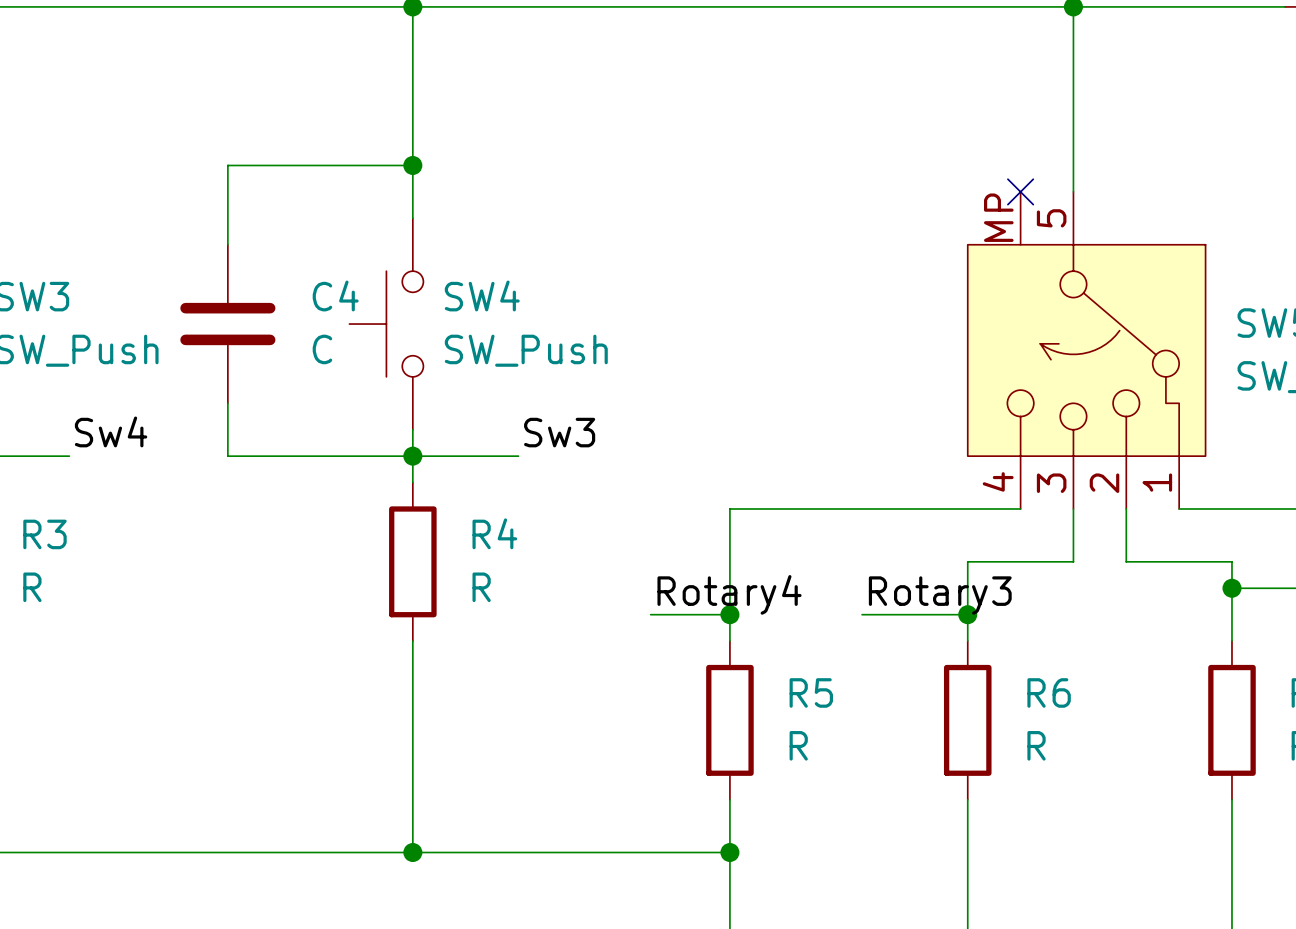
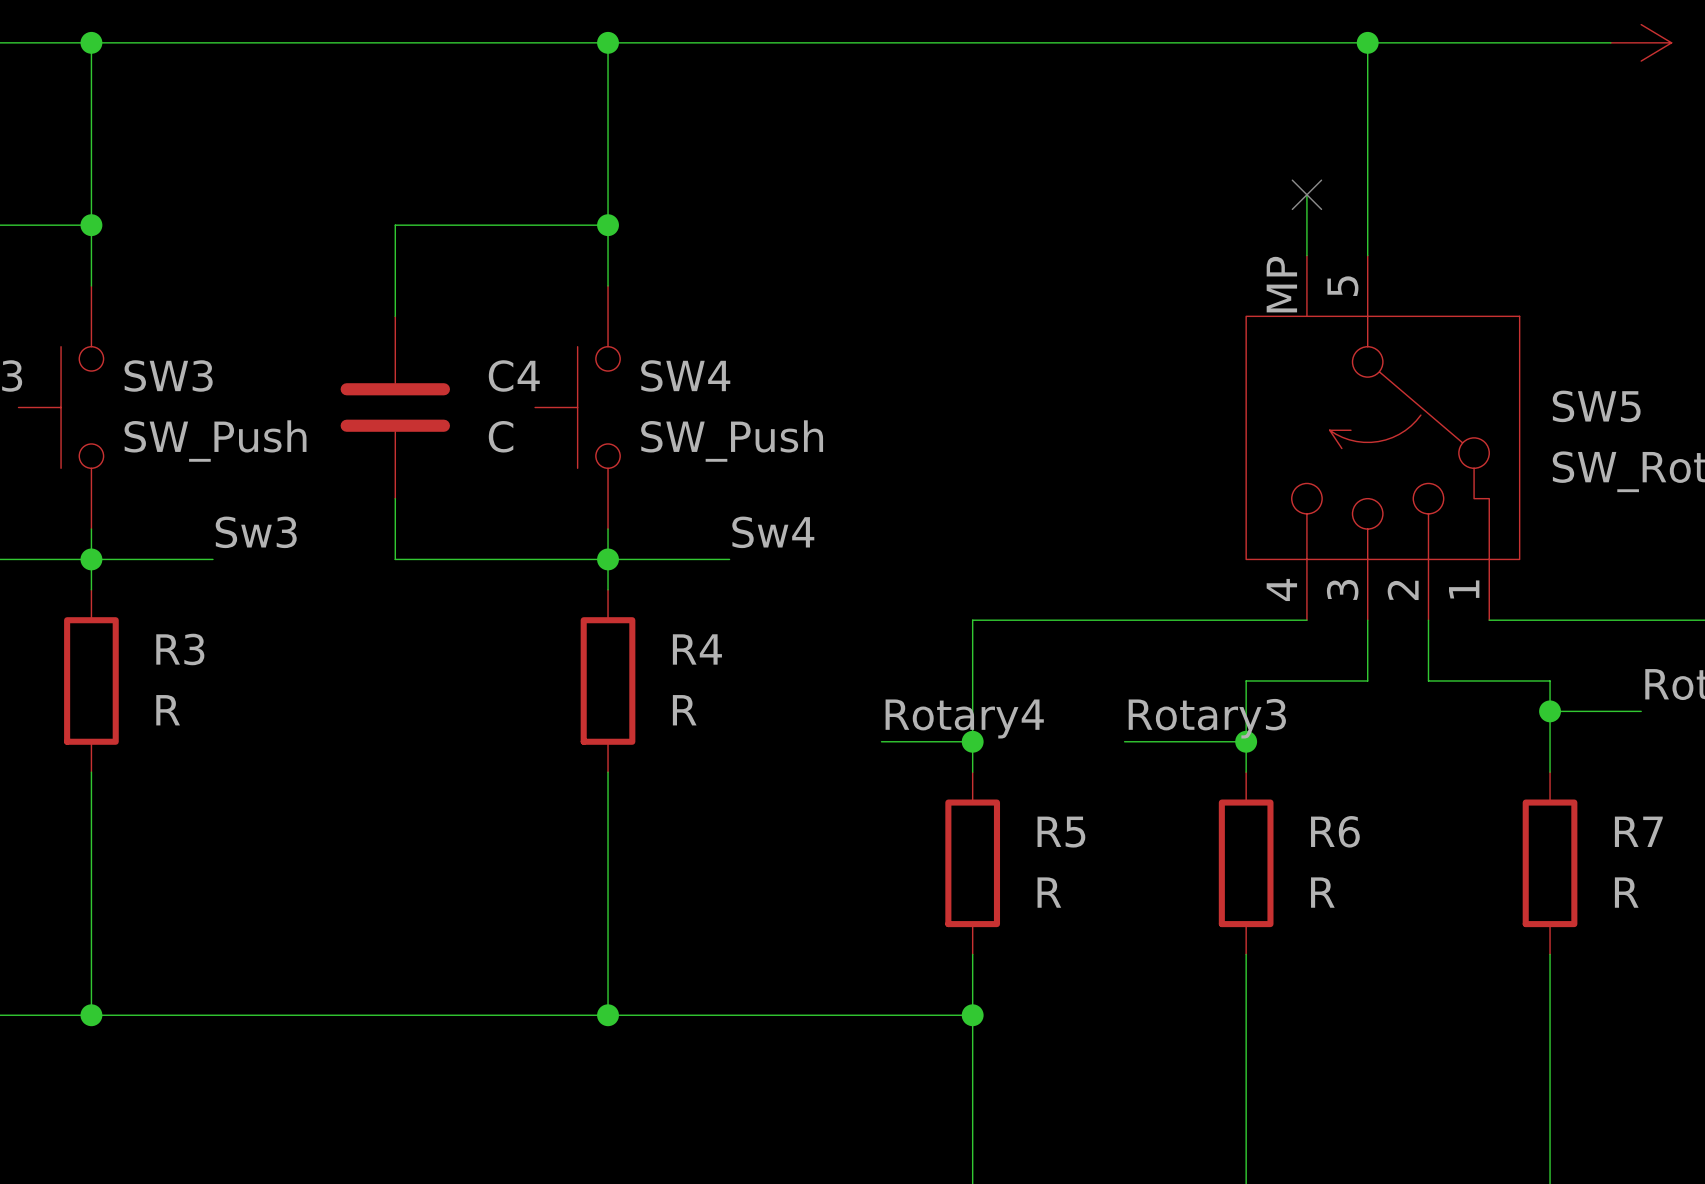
wire: none -> (1306, 194) (1306, 255)
no-connect mark position: (1020, 191) -> (1306, 194)
label: Sw4 (111, 431) -> Sw3 (256, 532)
label: Sw3 (559, 432) -> Sw4 (773, 532)

